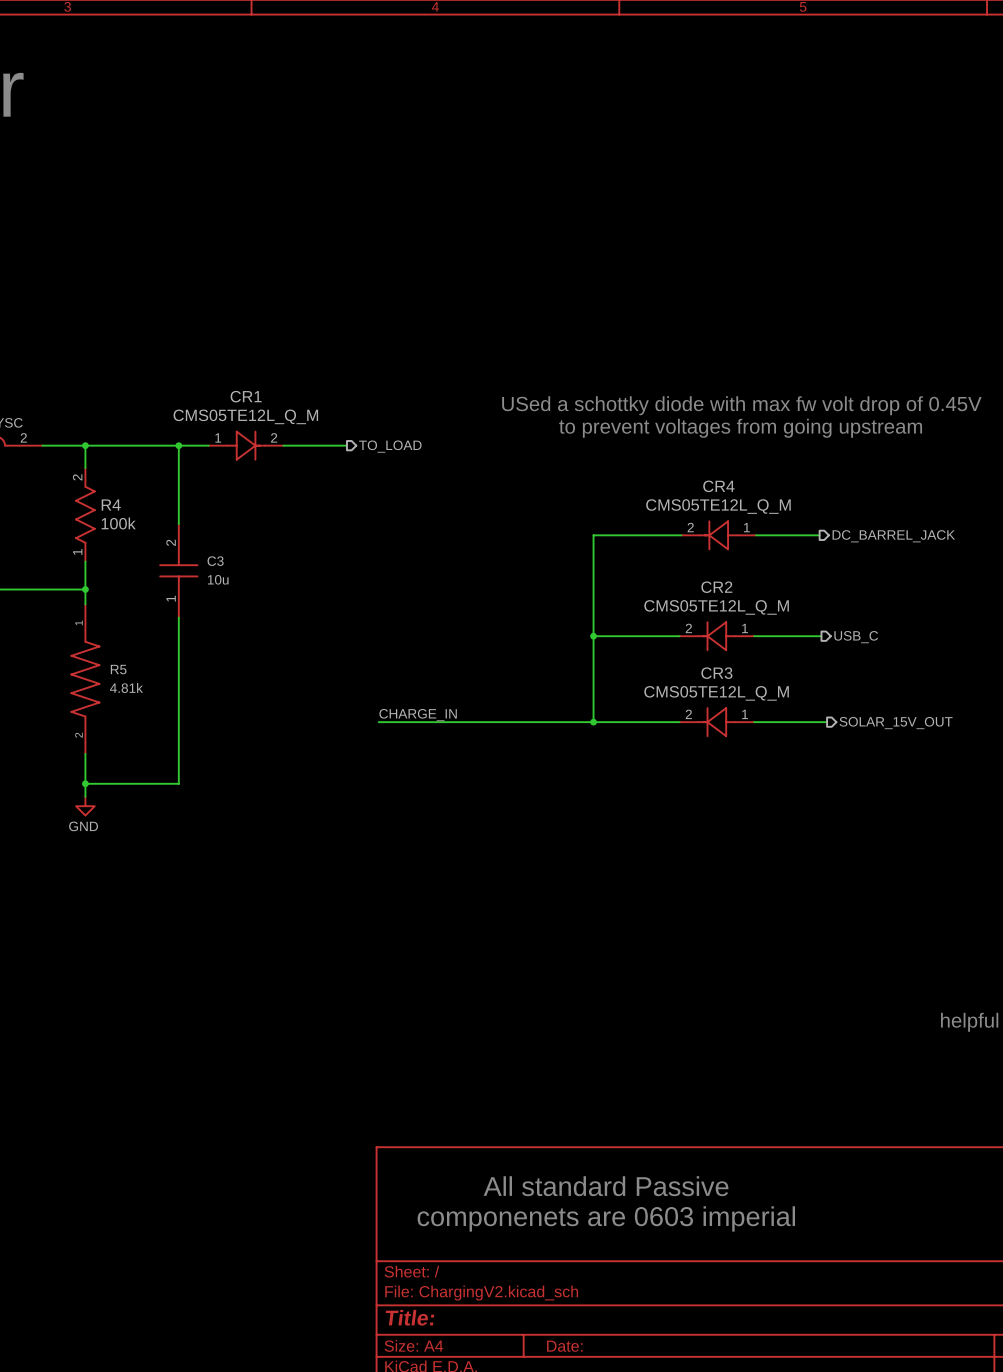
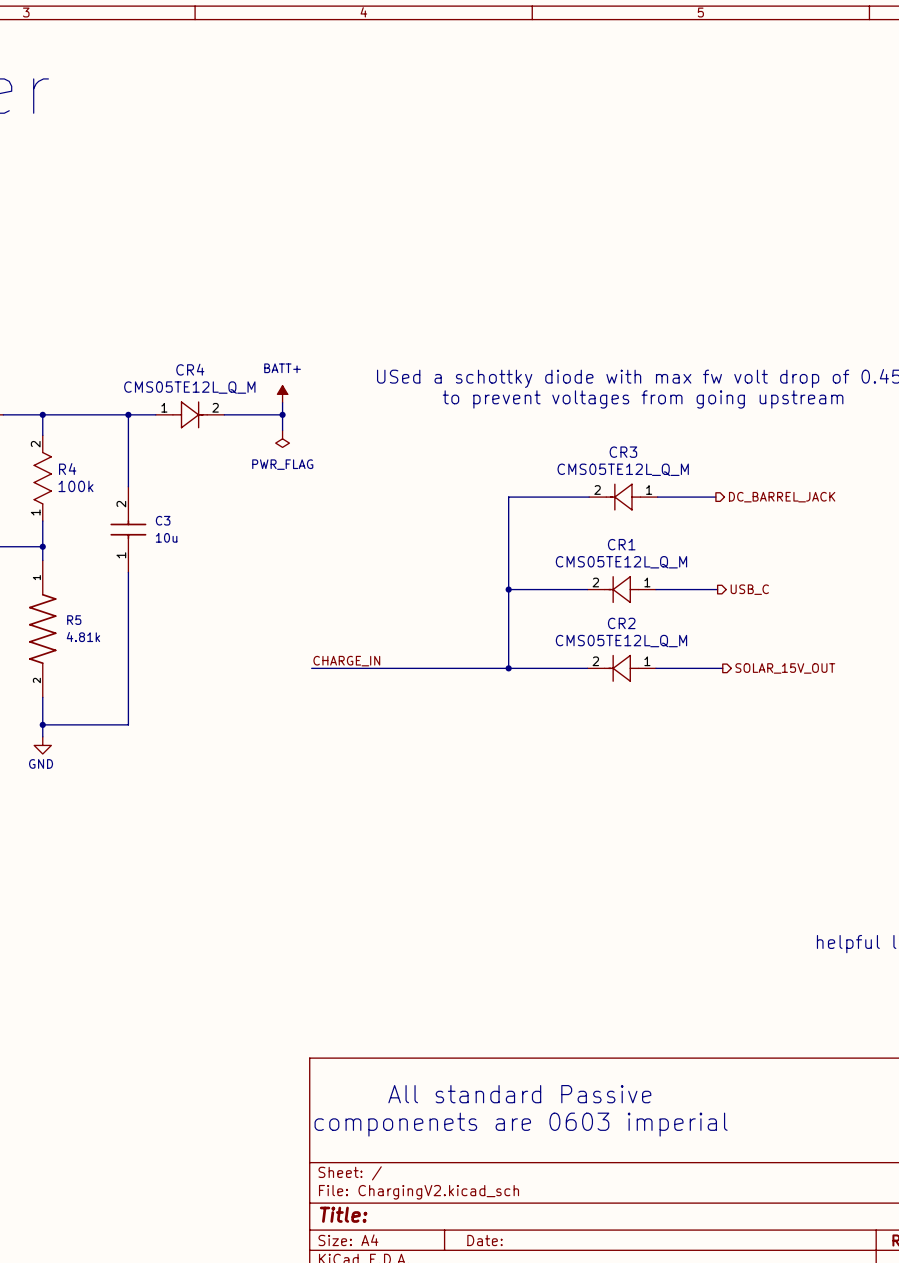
CR1 name: CR1 (246, 396) -> CR4 (190, 369)
power symbol: none -> BATT+ (282, 394)
wire: none -> (282, 402) (282, 430)
junction: none -> (282, 414)
hierarchical label: TO_LOAD (390, 446) -> none
power symbol: none -> PWR_FLAG (282, 438)
CR4 name: CR4 (718, 486) -> CR3 (623, 452)
CR2 name: CR2 (716, 587) -> CR1 (621, 544)
CR3 name: CR3 (716, 673) -> CR2 (621, 623)

